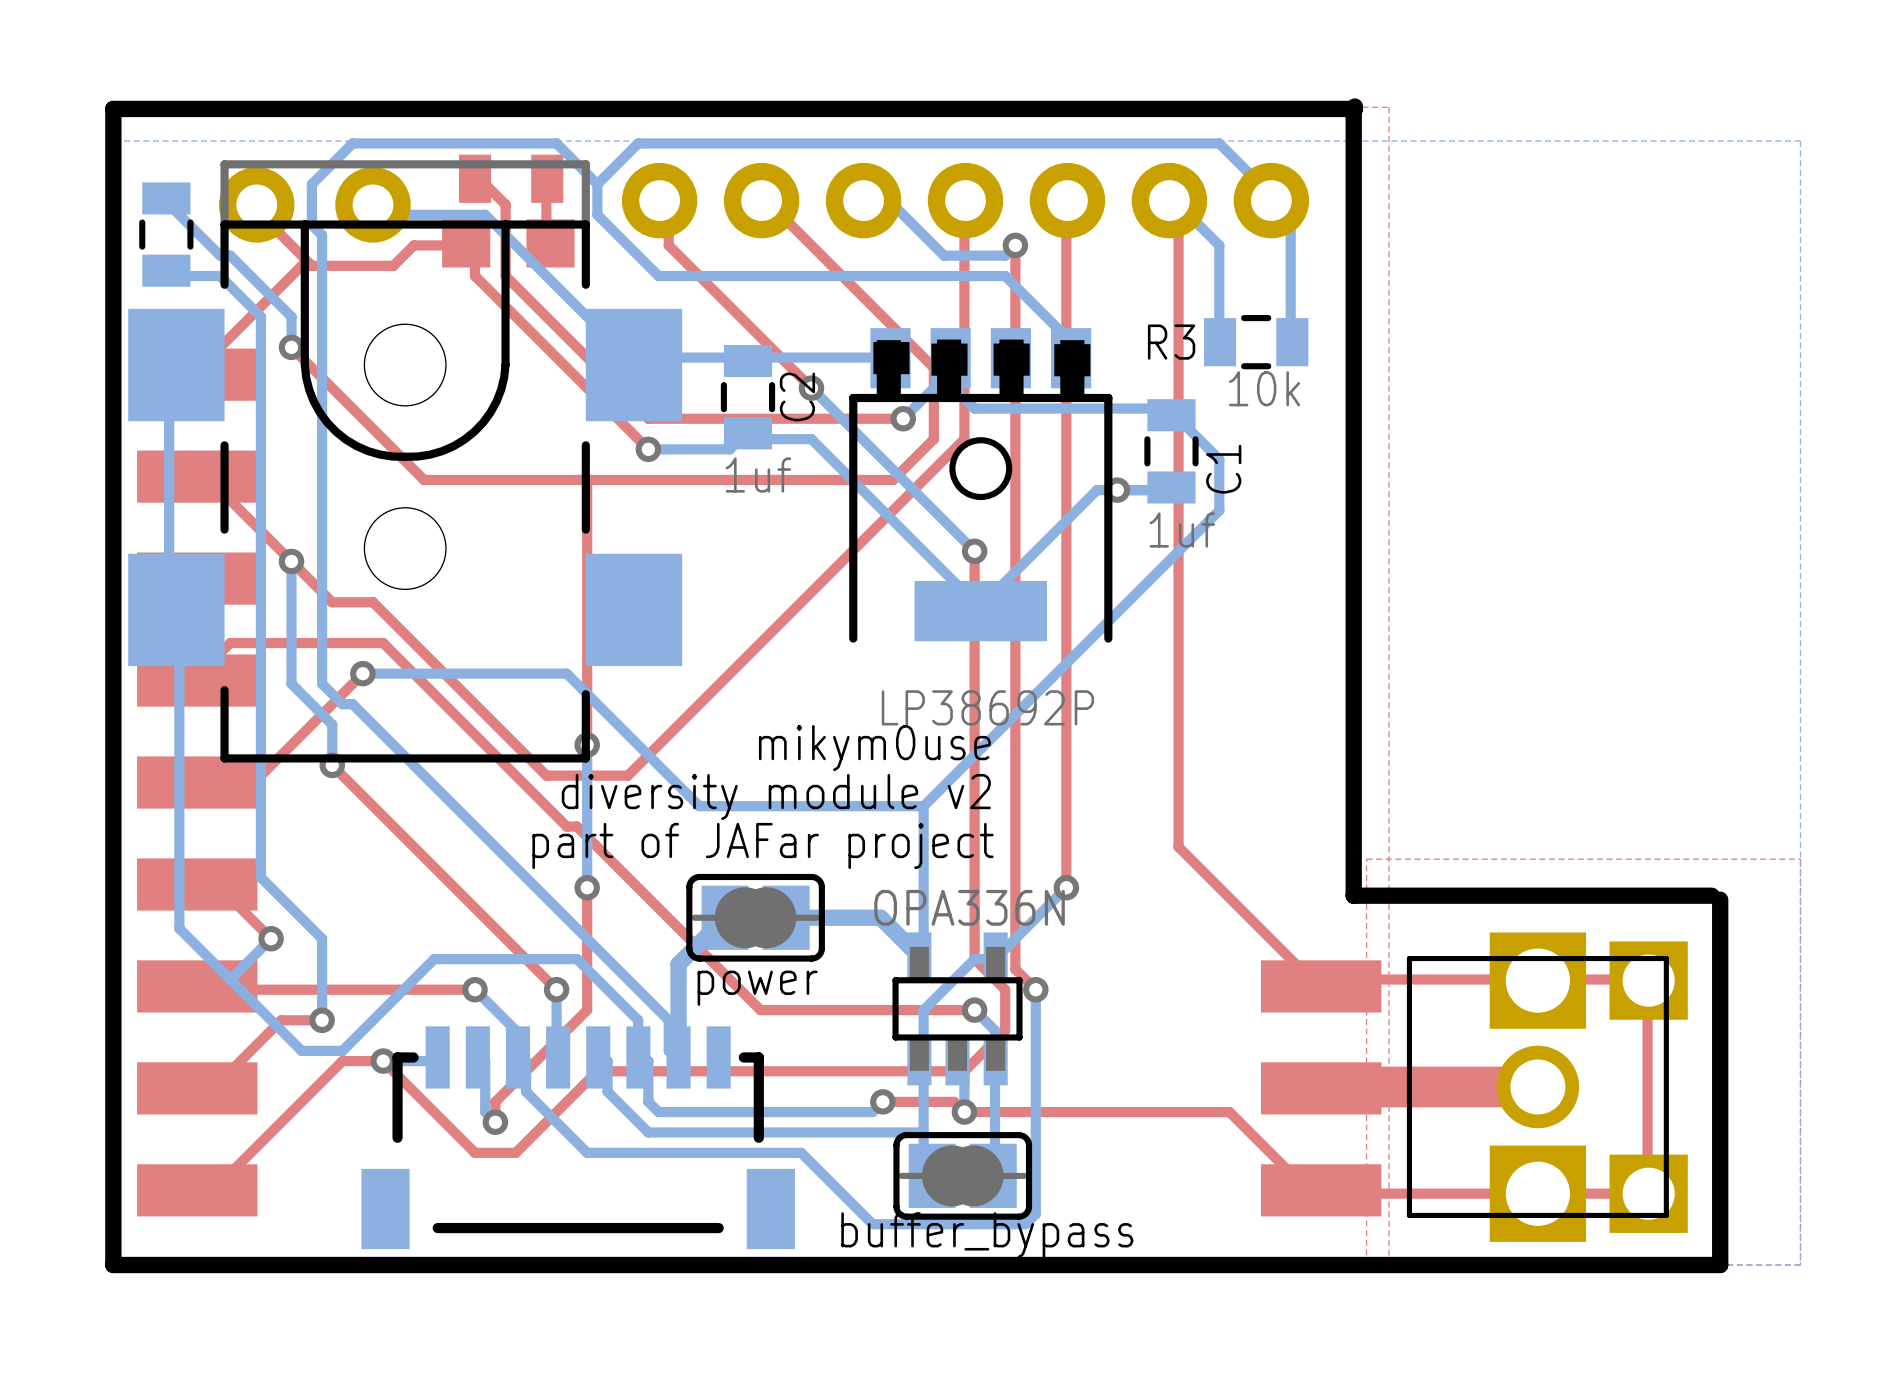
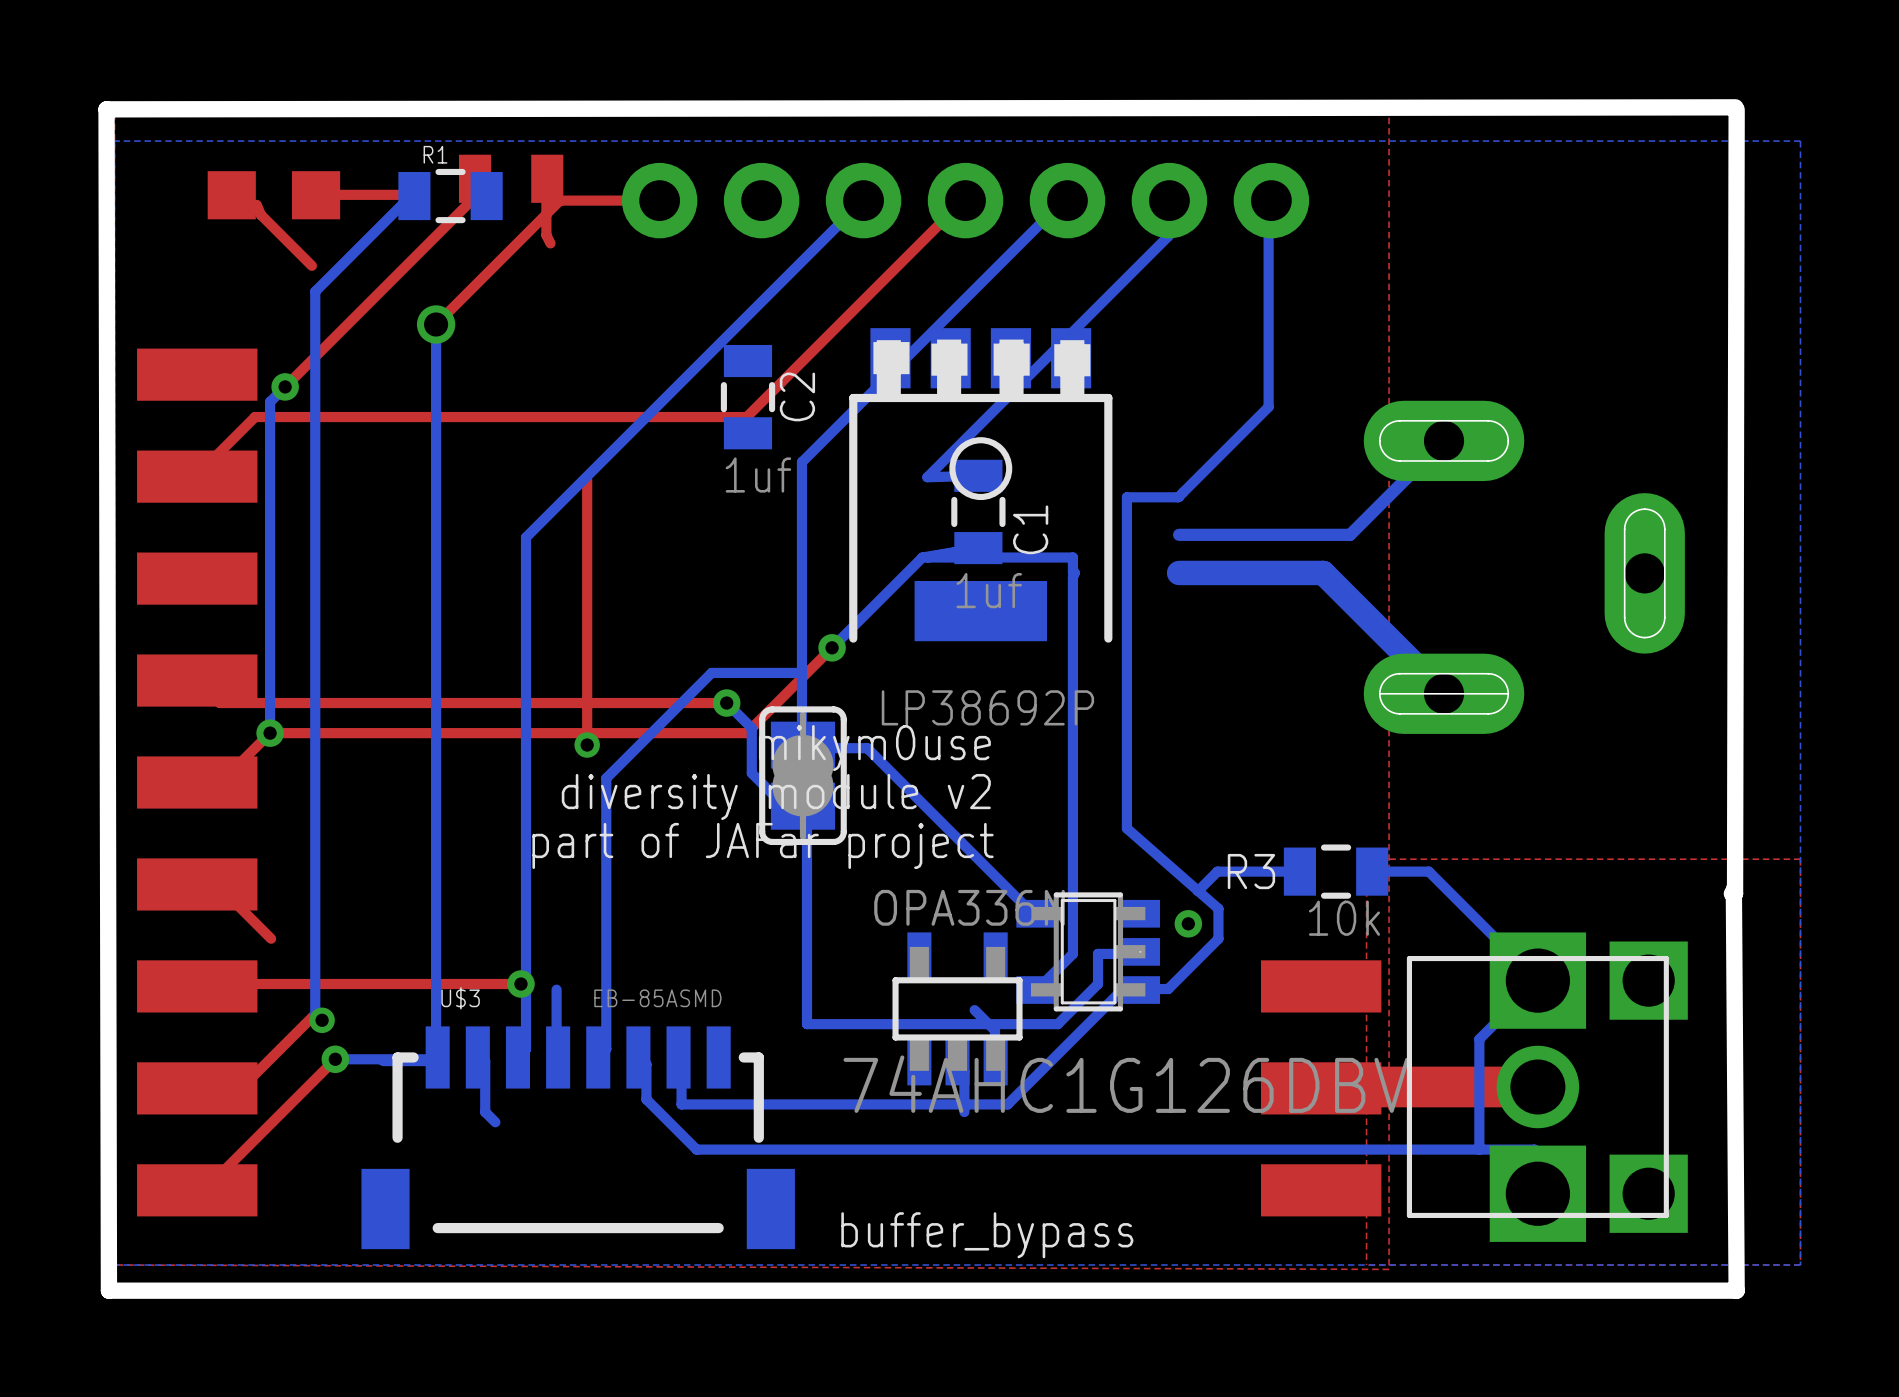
board edge: (1354, 106) (1354, 108) (113, 108) (113, 1265) (1720, 1265) (1720, 899) -> none
board edge: none -> (1735, 107) (106, 109) (108, 1290) (1736, 1290) (1733, 889)
board edge: (1353, 108) (1353, 895) (1711, 895) -> none
board edge: none -> (1736, 109) (1735, 893) (1731, 893)
top track: (475, 178) (475, 184) (485, 184) (505, 204) (505, 276) (648, 418) (903, 418) -> none
bottom track: (597, 184) (597, 214) (658, 276) (1005, 276) (1066, 337) (1066, 357) (1071, 358) -> none
bottom track: (597, 184) (638, 143) (1219, 143) (1270, 194) (1271, 200) (1280, 204) (1290, 214) (1290, 337) (1292, 342) -> none
bottom track: (597, 184) (556, 143) (352, 143) (311, 184) (311, 225) (322, 235) (322, 683) (342, 704) (352, 704) (668, 1020) (668, 1050) (678, 1057) (678, 964) (725, 917) -> none
top track: none -> (408, 194) (316, 194)
top track: none -> (480, 194) (475, 196) (285, 386)
bottom track: none -> (414, 196) (410, 196) (315, 291) (315, 1014)
R1: none -> (450, 196)
bottom track: (166, 198) (169, 204) (220, 255) (230, 255) (291, 316) (291, 347) -> none
top track: (659, 200) (668, 204) (668, 245) (811, 388) -> (659, 200) (559, 200) (436, 324)
top track: (761, 200) (770, 204) (933, 367) (933, 439) (893, 479) (424, 479) (291, 347) -> none
bottom track: (863, 200) (872, 204) (893, 204) (944, 255) (1005, 255) (1015, 245) -> (863, 200) (526, 537) (526, 1049) (517, 1057)
top track: (965, 200) (964, 439) (627, 775) (546, 775) (373, 602) (332, 602) (199, 469) (197, 476) -> (965, 200) (962, 201) (746, 417) (255, 417) (197, 476)
top track: (1067, 200) (1066, 887) -> none
bottom track: none -> (1067, 200) (1062, 201) (801, 462) (801, 743) (806, 748) (867, 748) (1032, 913) (1036, 913)
top track: (1169, 200) (1178, 204) (1178, 846) (1311, 979) (1321, 986) (1321, 979) (1647, 979) (1647, 1193) (1321, 1193) (1321, 1190) (1311, 1193) (1229, 1112) (964, 1112) (954, 1101) (882, 1101) -> none
bottom track: (1169, 200) (1178, 204) (1219, 245) (1220, 342) -> (1169, 200) (1168, 236) (927, 477) (978, 475)
bottom track: none -> (1271, 200) (1268, 201) (1268, 406) (1178, 497) (1126, 497) (1126, 828) (1218, 908) (1218, 938) (1168, 989) (1143, 989) (1138, 994) (1118, 994) (1007, 1104) (681, 1104) (681, 1059) (678, 1057)
part: (314, 204) -> none
bottom track: (372, 204) (373, 214) (485, 214) (633, 365) (638, 357) (740, 357) (747, 361) (750, 357) (890, 358) -> none
part: (166, 234) -> none
part position: (508, 243) -> (273, 195)
top track: (1015, 245) (1015, 969) (1035, 989) -> none
via: (1015, 245) -> none
bottom track: (166, 270) (169, 276) (220, 276) (260, 316) (260, 877) (322, 938) (322, 1020) -> none
bottom track: none -> (436, 324) (436, 1055) (437, 1057) (435, 1059) (335, 1059)
via: none -> (436, 324)
R3 position: (1256, 342) -> (1336, 871)
via: (291, 347) -> none
bottom track: (176, 365) (169, 367) (169, 602) (179, 612) (179, 928) (301, 1050) (342, 1050) (434, 959) (576, 959) (638, 1020) (638, 1057) (648, 1061) (648, 1101) (658, 1112) (872, 1112) (882, 1101) -> none
top track: (197, 374) (199, 367) (301, 265) (393, 265) (413, 245) (464, 245) (466, 243) (475, 245) (475, 276) (648, 449) -> none
bottom track: none -> (285, 386) (270, 401) (270, 733)
via: none -> (285, 386)
bottom track: (811, 388) (974, 551) -> none
via: (811, 388) -> none
bottom track: (903, 418) (954, 367) (950, 358) (944, 377) (974, 408) (1168, 408) (1171, 415) (1178, 418) (1219, 459) (1219, 510) (923, 806) -> none
via: (903, 418) -> none
bottom track: none -> (1444, 440) (1350, 534) (1179, 534)
bottom track: (648, 449) (729, 449) (747, 433) (750, 439) (811, 439) (974, 602) (980, 611) (984, 602) (1096, 490) (1168, 490) (1171, 487) -> none
via: (648, 449) -> none
C1 position: (1171, 451) -> (978, 511)
part: (405, 461) -> none
via: (1117, 490) -> none
top track: (974, 551) (974, 959) (1005, 989) (1005, 1030) (964, 1071) (597, 1071) (515, 1152) (475, 1152) (383, 1061) (342, 1061) (220, 1183) (199, 1183) (197, 1190) -> (335, 1059) (204, 1189) (197, 1190)
via: (974, 551) -> none
bottom track: (291, 561) (291, 683) (332, 724) (332, 765) -> none
via: (291, 561) -> none
part: none -> (1524, 567)
bottom track: none -> (1179, 572) (1323, 572) (1444, 693)
via: none -> (832, 647)
top track: (362, 673) (260, 775) (199, 775) (197, 782) -> (832, 647) (746, 733) (270, 733) (224, 778) (199, 778) (197, 782)
bottom track: (362, 673) (566, 673) (699, 806) (923, 806) -> none
via: (362, 673) -> none
top track: (197, 680) (199, 673) (230, 643) (383, 643) (566, 826) (576, 826) (760, 1010) (974, 1010) -> (197, 680) (219, 703) (726, 703)
bottom track: none -> (726, 703) (751, 728) (751, 773) (801, 823) (802, 806) (806, 808) (806, 1024) (1057, 1024) (1098, 984) (1098, 953) (1138, 953) (1140, 951)
via: none -> (726, 703)
via: none -> (270, 733)
bottom track: (587, 745) (587, 887) -> none
top track: (332, 765) (556, 989) -> none
via: (332, 765) -> none
bottom track: (923, 806) (923, 948) (919, 956) (880, 917) (786, 917) -> none
bottom track: none -> (1299, 871) (1217, 871) (1198, 890)
bottom track: none -> (1372, 871) (1428, 871) (1537, 980) (1479, 1039) (1479, 1149)
top track: (587, 887) (587, 1010) (495, 1101) (495, 1122) -> none
via: (587, 887) -> none
bottom track: (1066, 887) (995, 959) (974, 959) (923, 1010) (923, 1061) (919, 1061) (923, 1071) (923, 1173) (932, 1175) -> none
via: (1066, 887) -> none
part rotation: 0° (755, 917) -> 90° clockwise (802, 775)
part position: (755, 917) -> (802, 775)
via: none -> (1188, 923)
bottom track: (271, 938) (230, 979) -> none
via: (271, 938) -> none
part: none -> 74AHC1G126DBV (1088, 951)
via: none -> (520, 984)
top track: (197, 986) (199, 989) (475, 989) -> (197, 986) (199, 984) (520, 984)
text: power (757, 988) -> none
via: (475, 989) -> none
via: (556, 989) -> none
bottom track: (1035, 989) (1035, 1214) (1025, 1224) (872, 1224) (801, 1152) (587, 1152) (526, 1091) (526, 1061) (517, 1057) (515, 1050) (515, 1030) (475, 989) -> (1036, 990) (1072, 953) (1072, 577) (1074, 572) (1072, 572) (1072, 557) (927, 557) (978, 548) (922, 557) (832, 647)
via: (1035, 989) -> none
U$3 name: none -> U$3 (460, 998)
U$3 value: none -> EB-85ASMD (657, 998)
via: (974, 1010) -> none
top track: (322, 1020) (281, 1020) (220, 1081) (199, 1081) (197, 1088) -> (315, 1014) (245, 1084) (199, 1084) (197, 1088)
bottom track: (598, 1057) (607, 1061) (607, 1091) (648, 1132) (923, 1132) -> (598, 1057) (606, 1049) (606, 778) (711, 672) (801, 672)
bottom track: none -> (638, 1057) (646, 1064) (646, 1099) (696, 1149) (1534, 1149) (1534, 1189) (1537, 1193)
via: none -> (335, 1059)
via: (383, 1061) -> none
bottom track: (995, 1061) (995, 1173) (993, 1175) -> none
via: (882, 1101) -> none
via: (964, 1112) -> none
via: (495, 1122) -> none
part: (962, 1175) -> none

